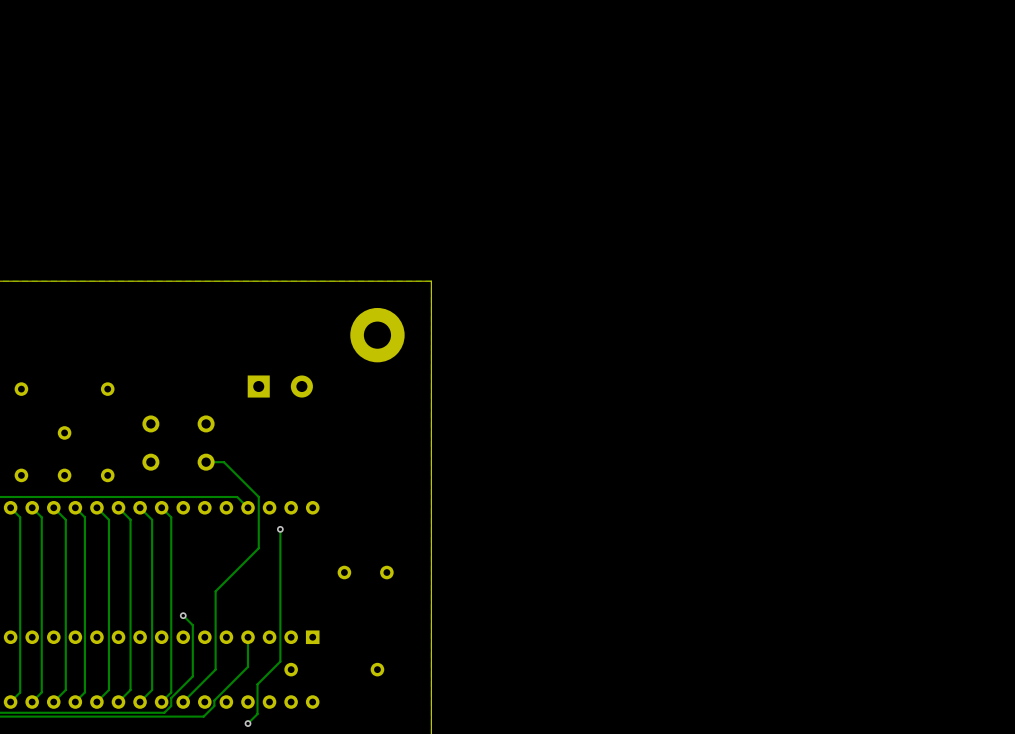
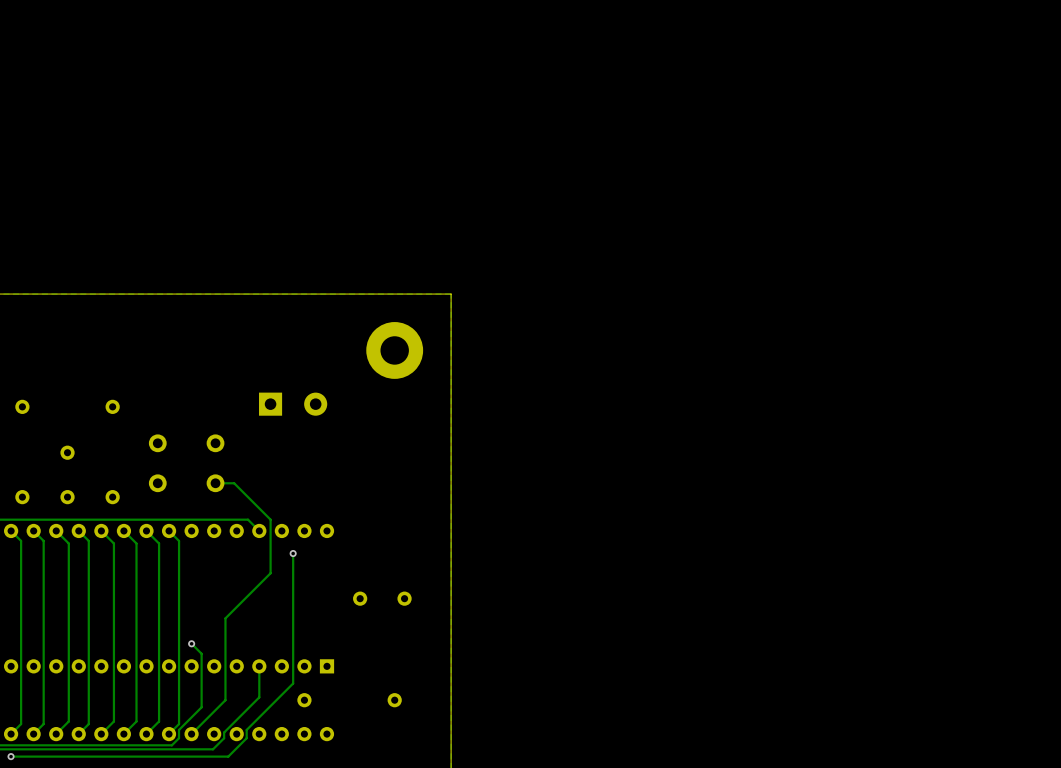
track: (280, 653) (280, 661) (257, 684) (257, 714) (247, 723) -> (293, 683) (246, 729) (246, 738) (228, 756) (11, 756)
via: none -> (11, 756)
via: (247, 723) -> none

